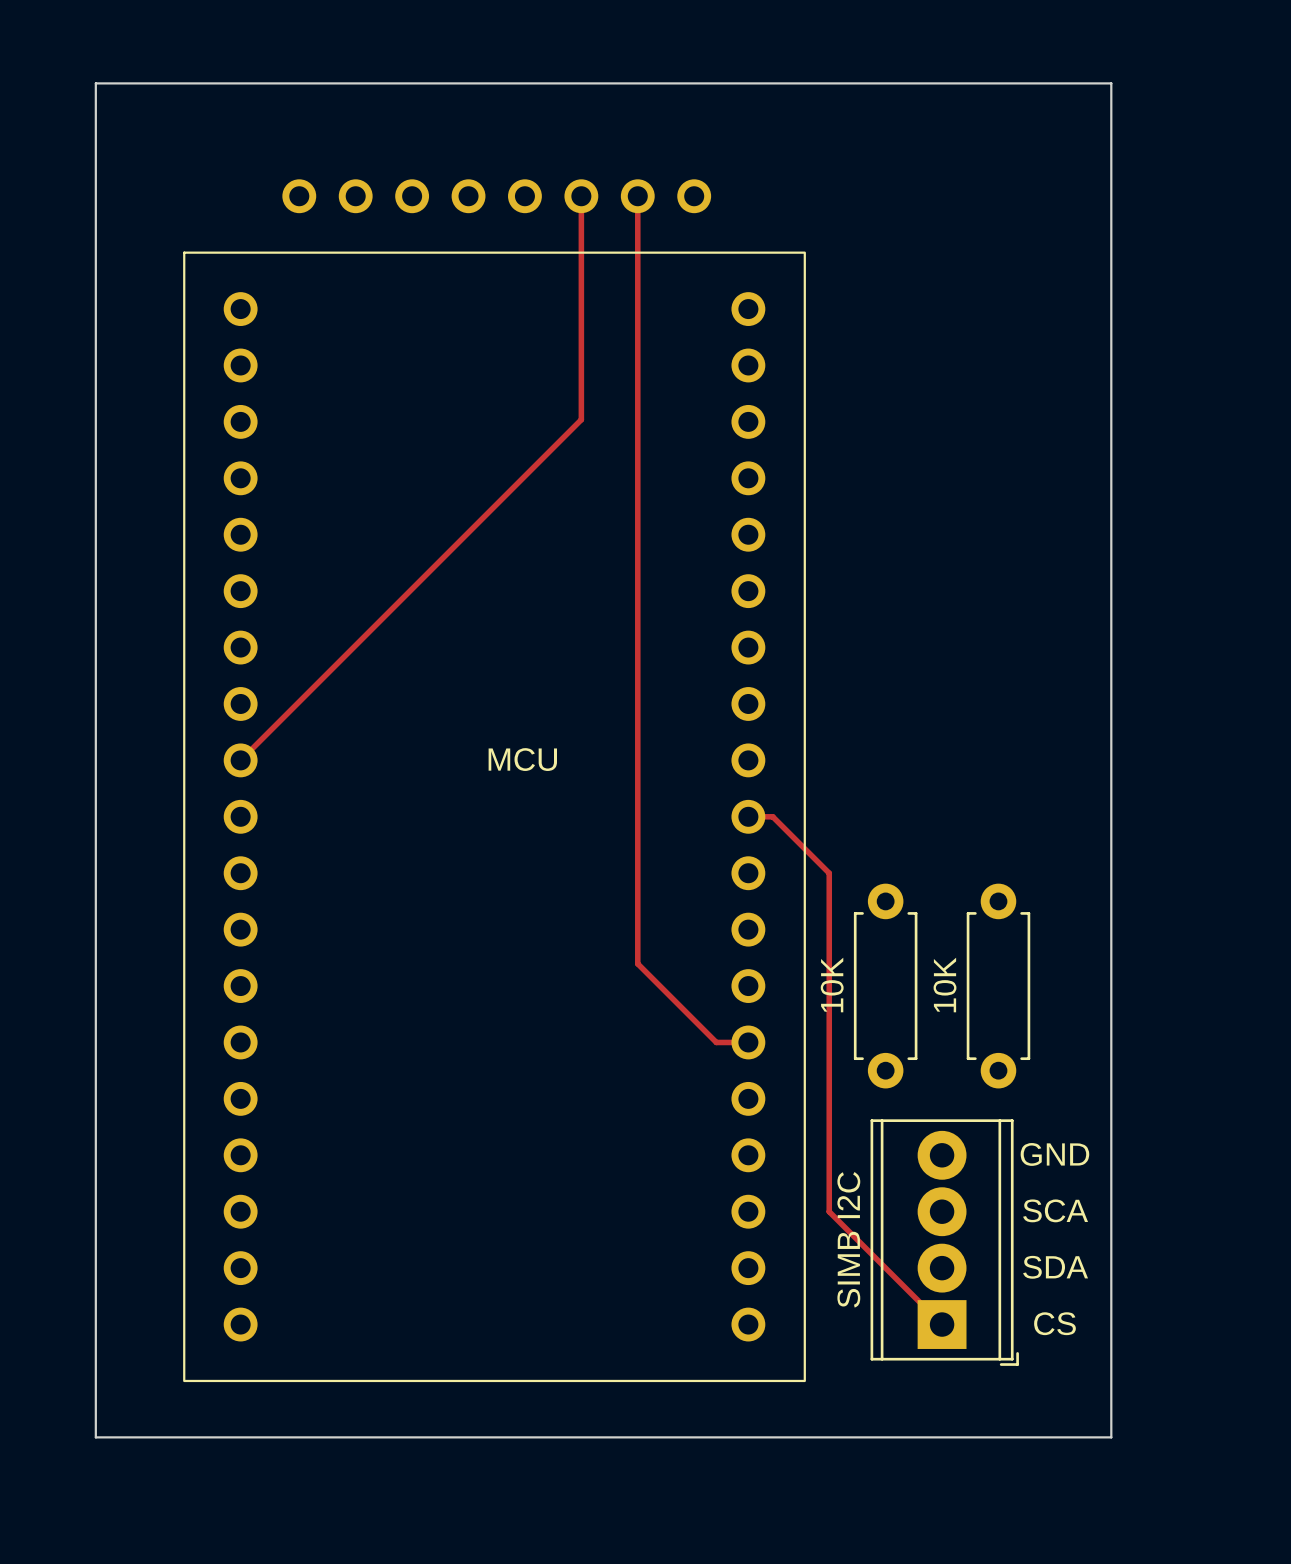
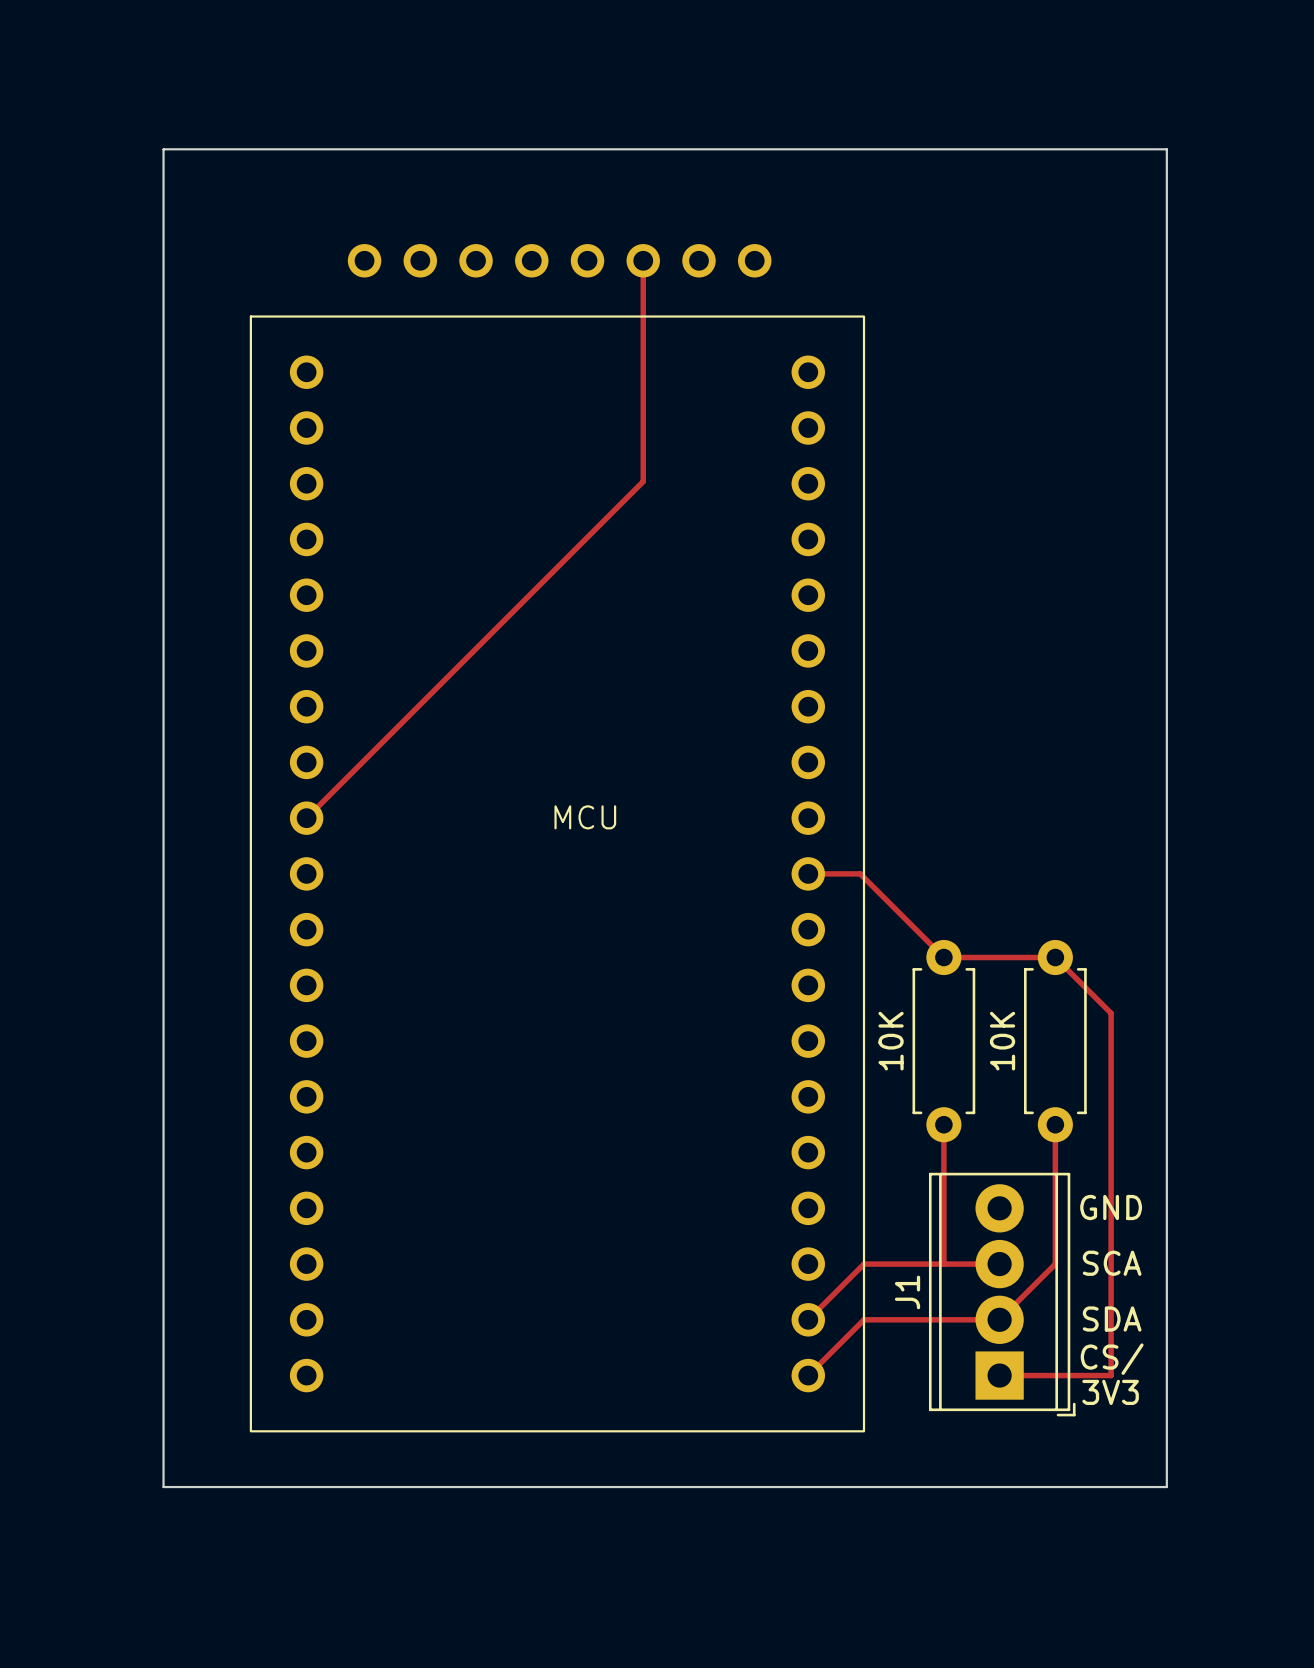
track: (637, 196) (637, 963) (716, 1042) (748, 1042) -> none
track: (772, 816) (829, 873) (829, 1211) (942, 1324) -> (832, 873) (860, 873) (943, 957) (1055, 957) (1111, 1013) (1111, 1375) (999, 1375)
track: none -> (943, 1124) (943, 1264)
track: none -> (1055, 1124) (1055, 1264) (999, 1319) (864, 1319) (808, 1375)
track: none -> (999, 1264) (864, 1264) (808, 1319)
SIMB I2C name: SIMB I2C (848, 1239) -> J1 (907, 1292)
text: CS (1054, 1323) -> CS/ (1112, 1359)
text: none -> 3V3 (1110, 1392)

